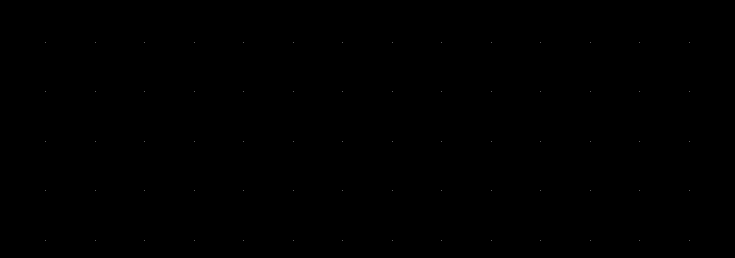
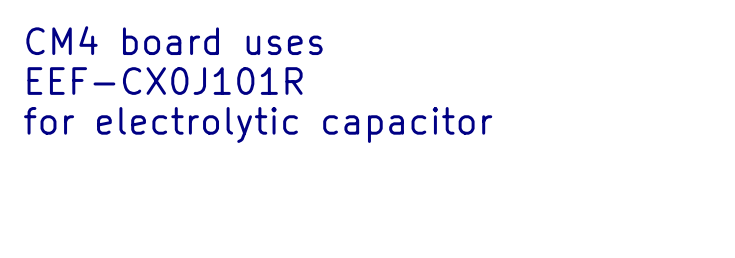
text: none -> CM4 board uses (174, 40)
text: none -> EEF-CX0J101R (165, 81)
text: none -> for electrolytic capacitor (258, 124)

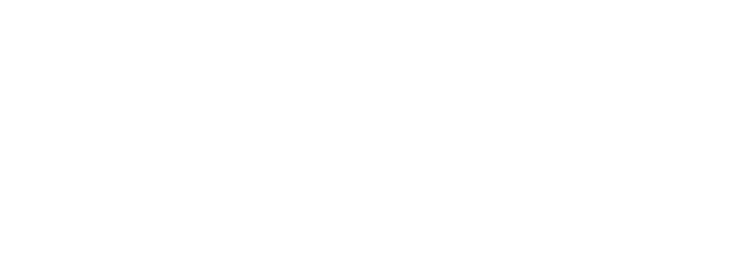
text: CM4 board uses (174, 40) -> none
text: EEF-CX0J101R (165, 81) -> none
text: for electrolytic capacitor (258, 124) -> none

